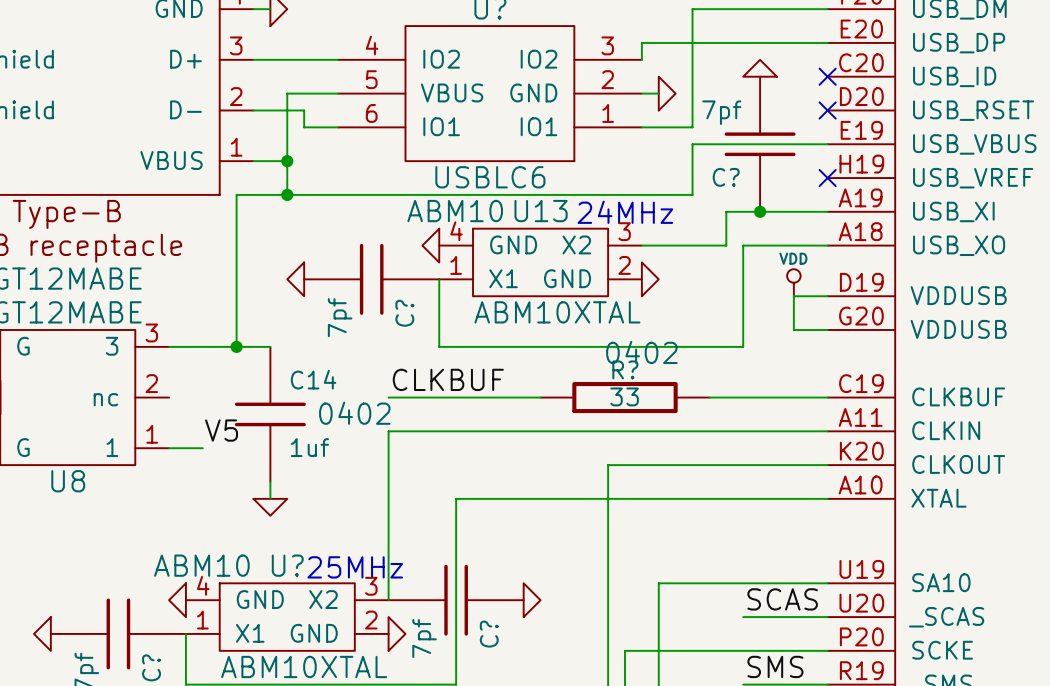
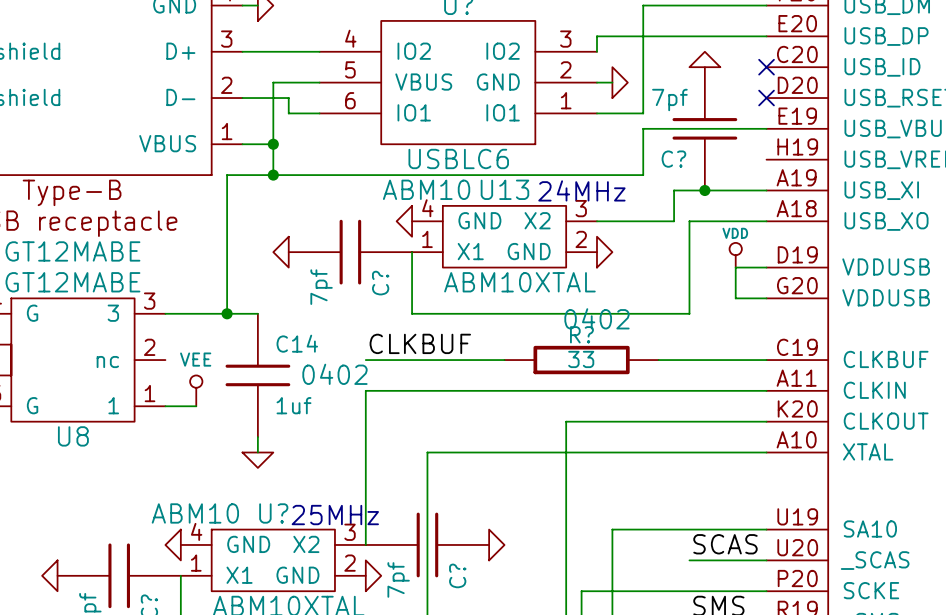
no-connect mark: (827, 178) -> none
label: V5 (221, 430) -> none
power symbol: none -> VEE (196, 390)

